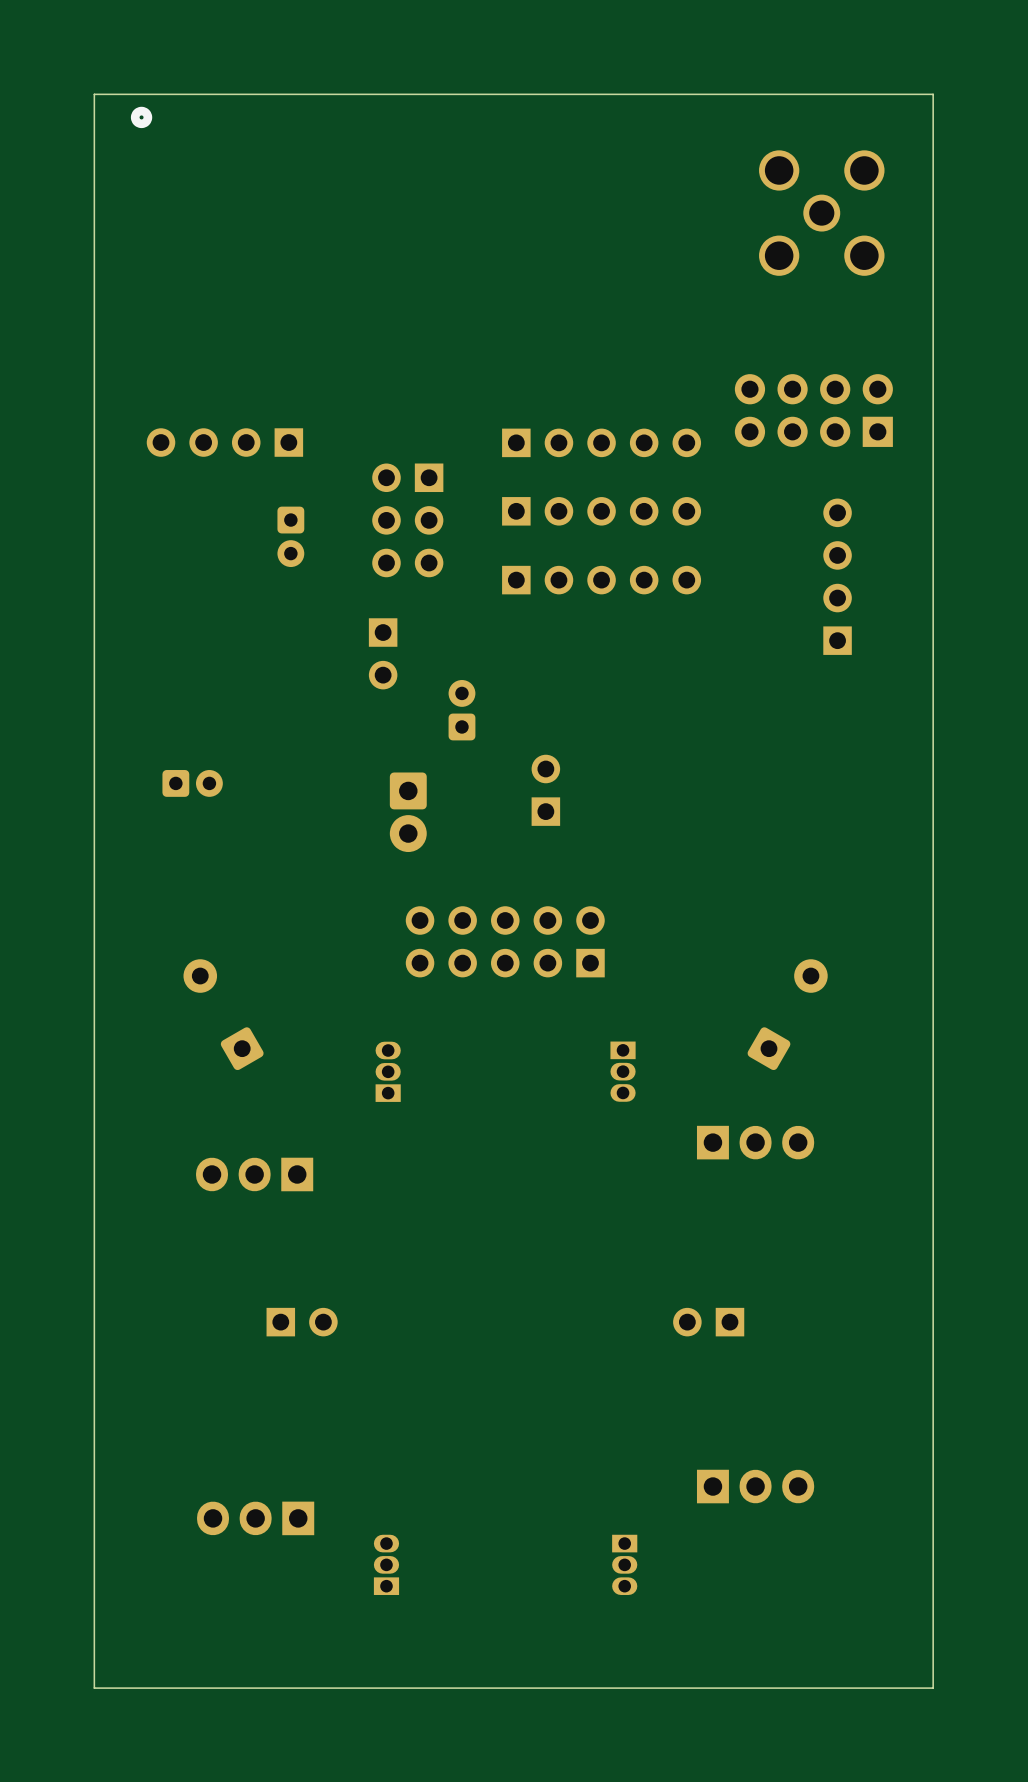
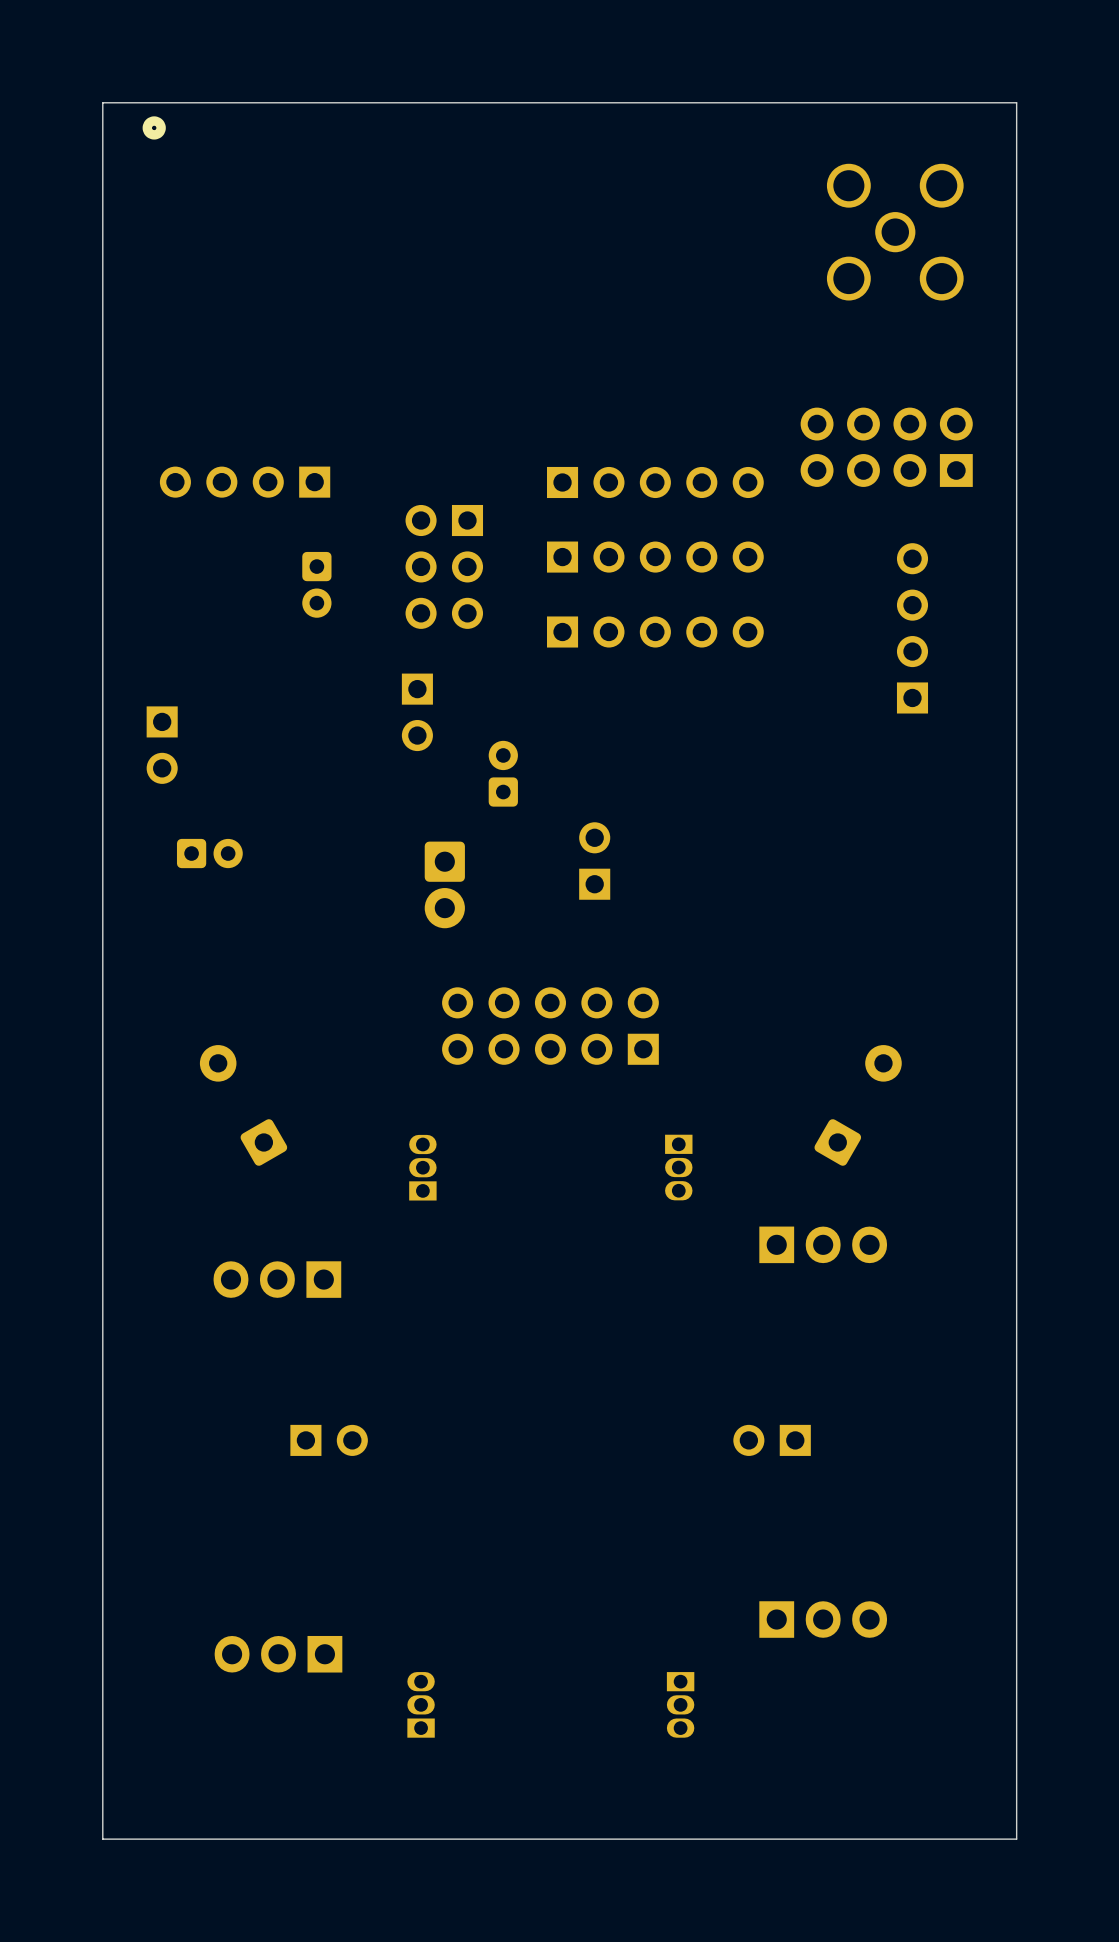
part: none -> (162, 745)

